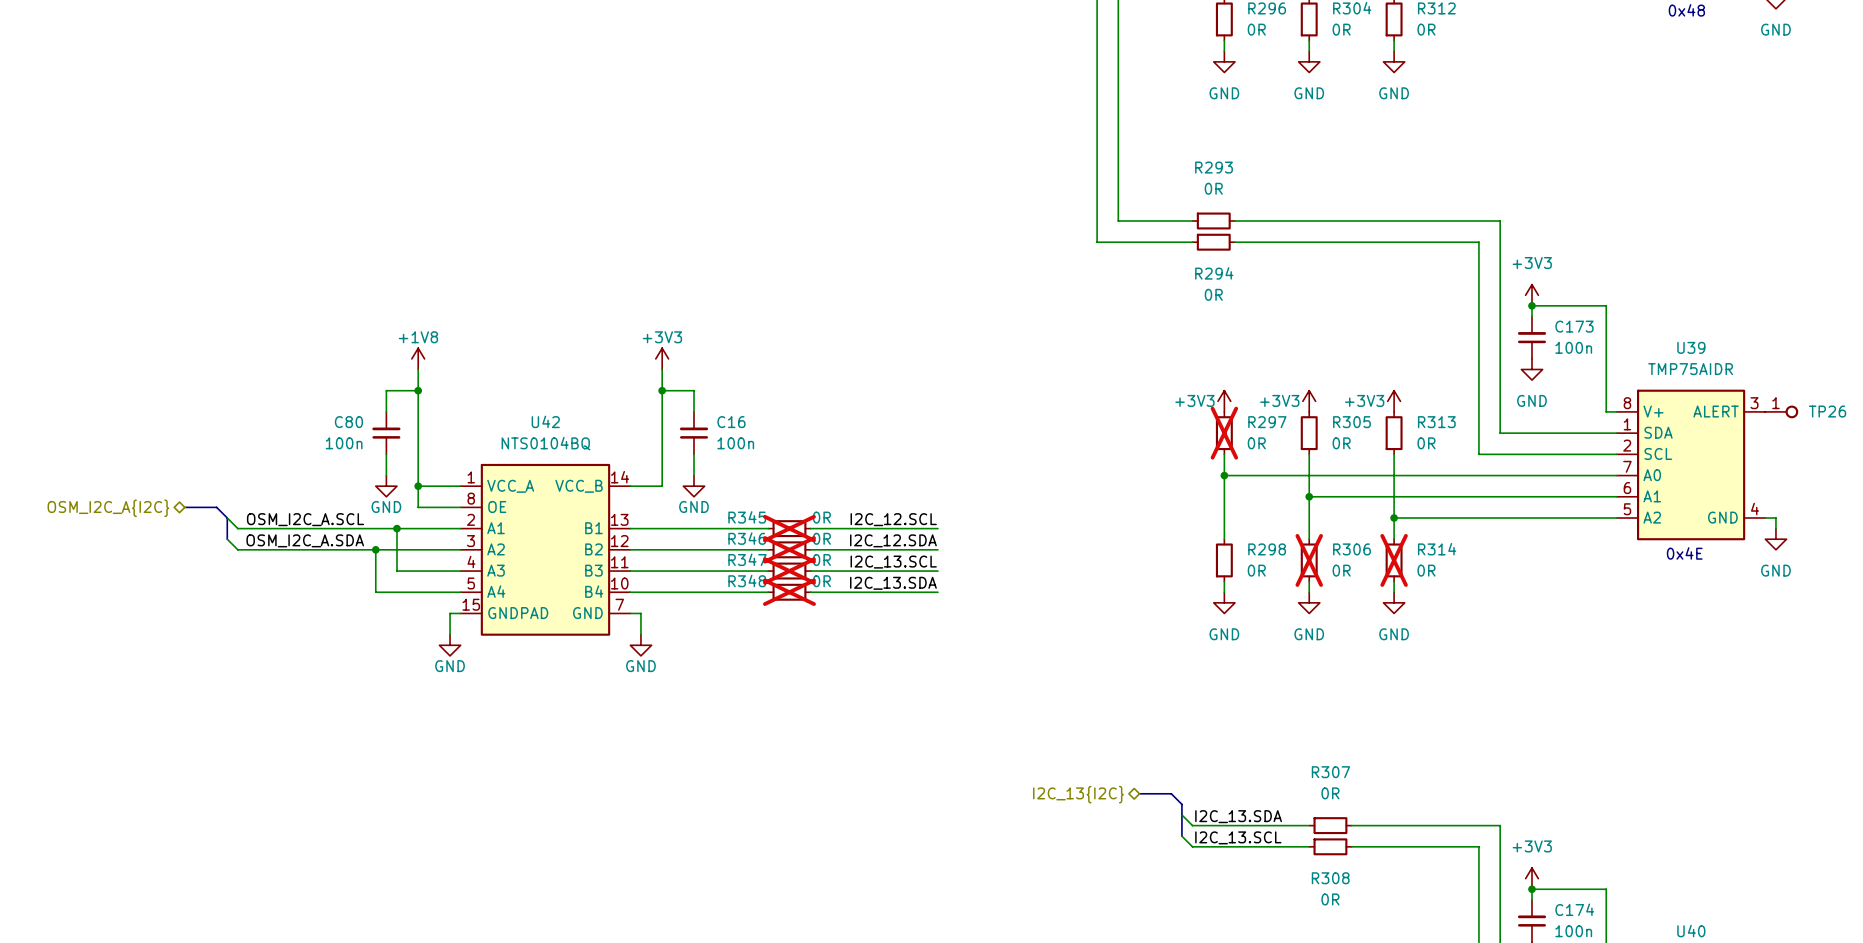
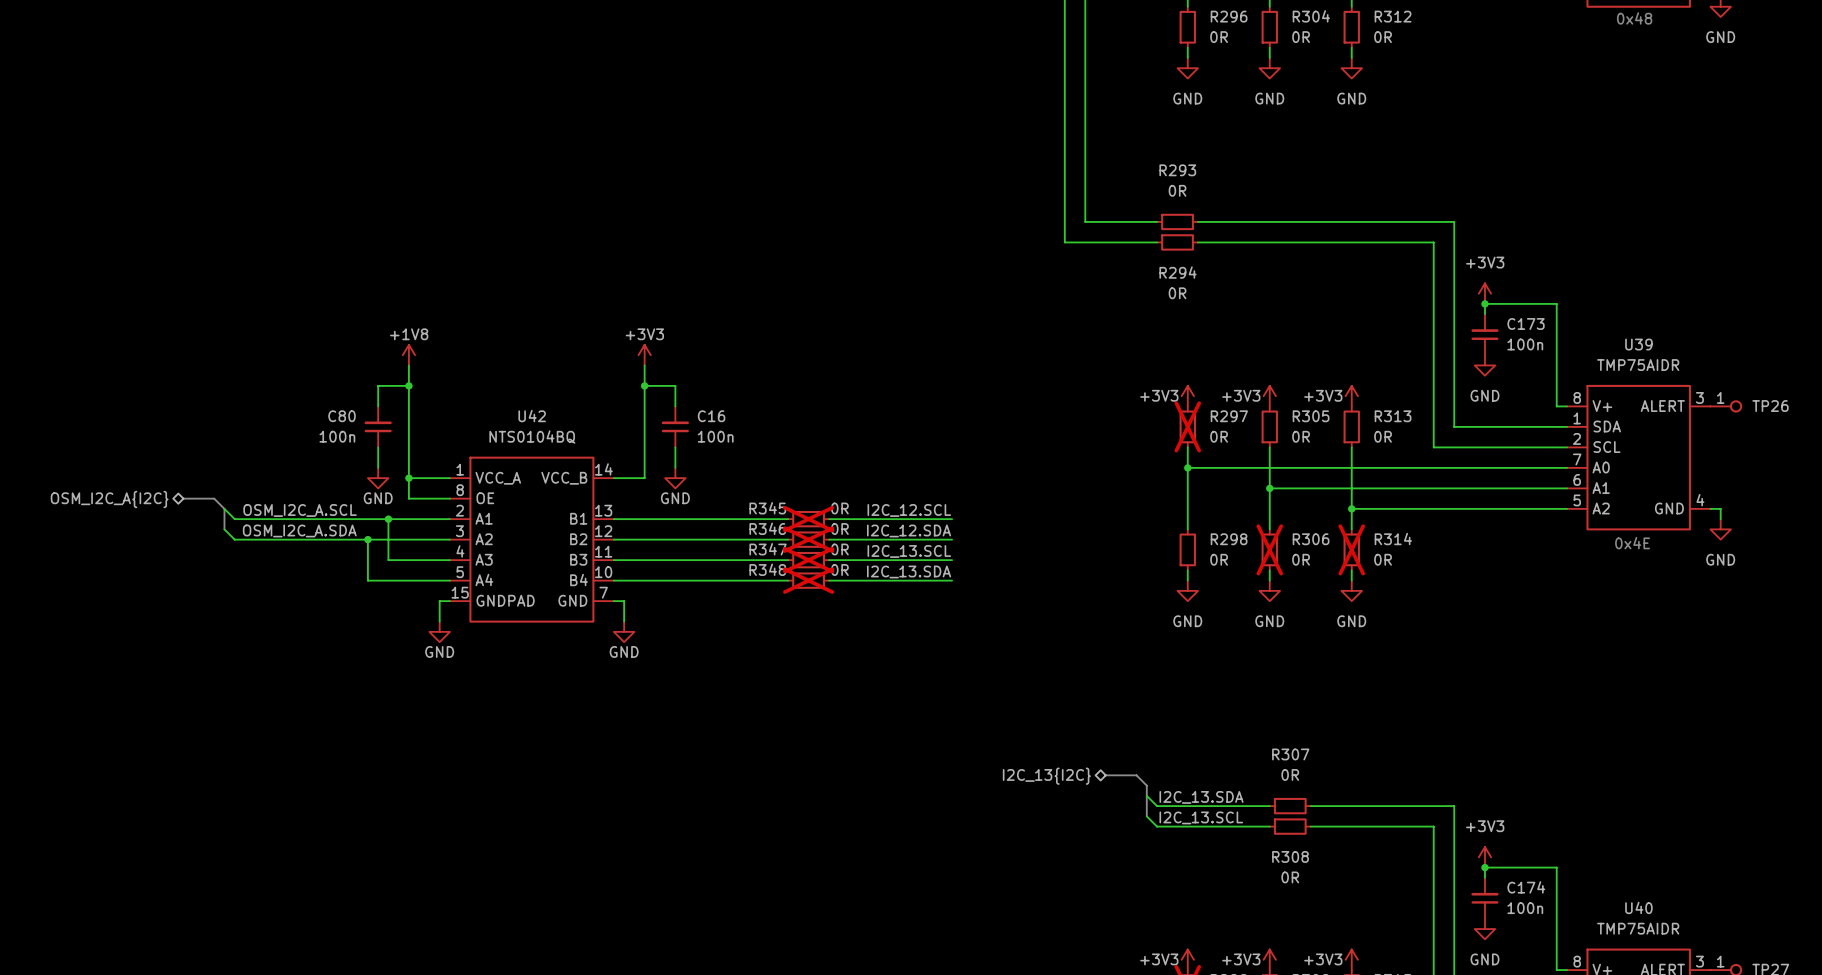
label position: I2C_12.SCL (893, 519) -> I2C_12.SCL (909, 510)
R345 position: (789, 528) -> (808, 519)
wire: none -> (911, 519) (952, 519)
label position: I2C_12.SDA (893, 540) -> I2C_12.SDA (909, 530)
R346 position: (789, 549) -> (808, 539)
wire: none -> (911, 539) (952, 539)
label position: I2C_13.SCL (893, 562) -> I2C_13.SCL (909, 551)
R347 position: (789, 571) -> (808, 560)
wire: none -> (911, 560) (952, 560)
label position: I2C_13.SDA (893, 583) -> I2C_13.SDA (909, 571)
R348 position: (789, 592) -> (808, 580)
wire: none -> (911, 580) (952, 580)

